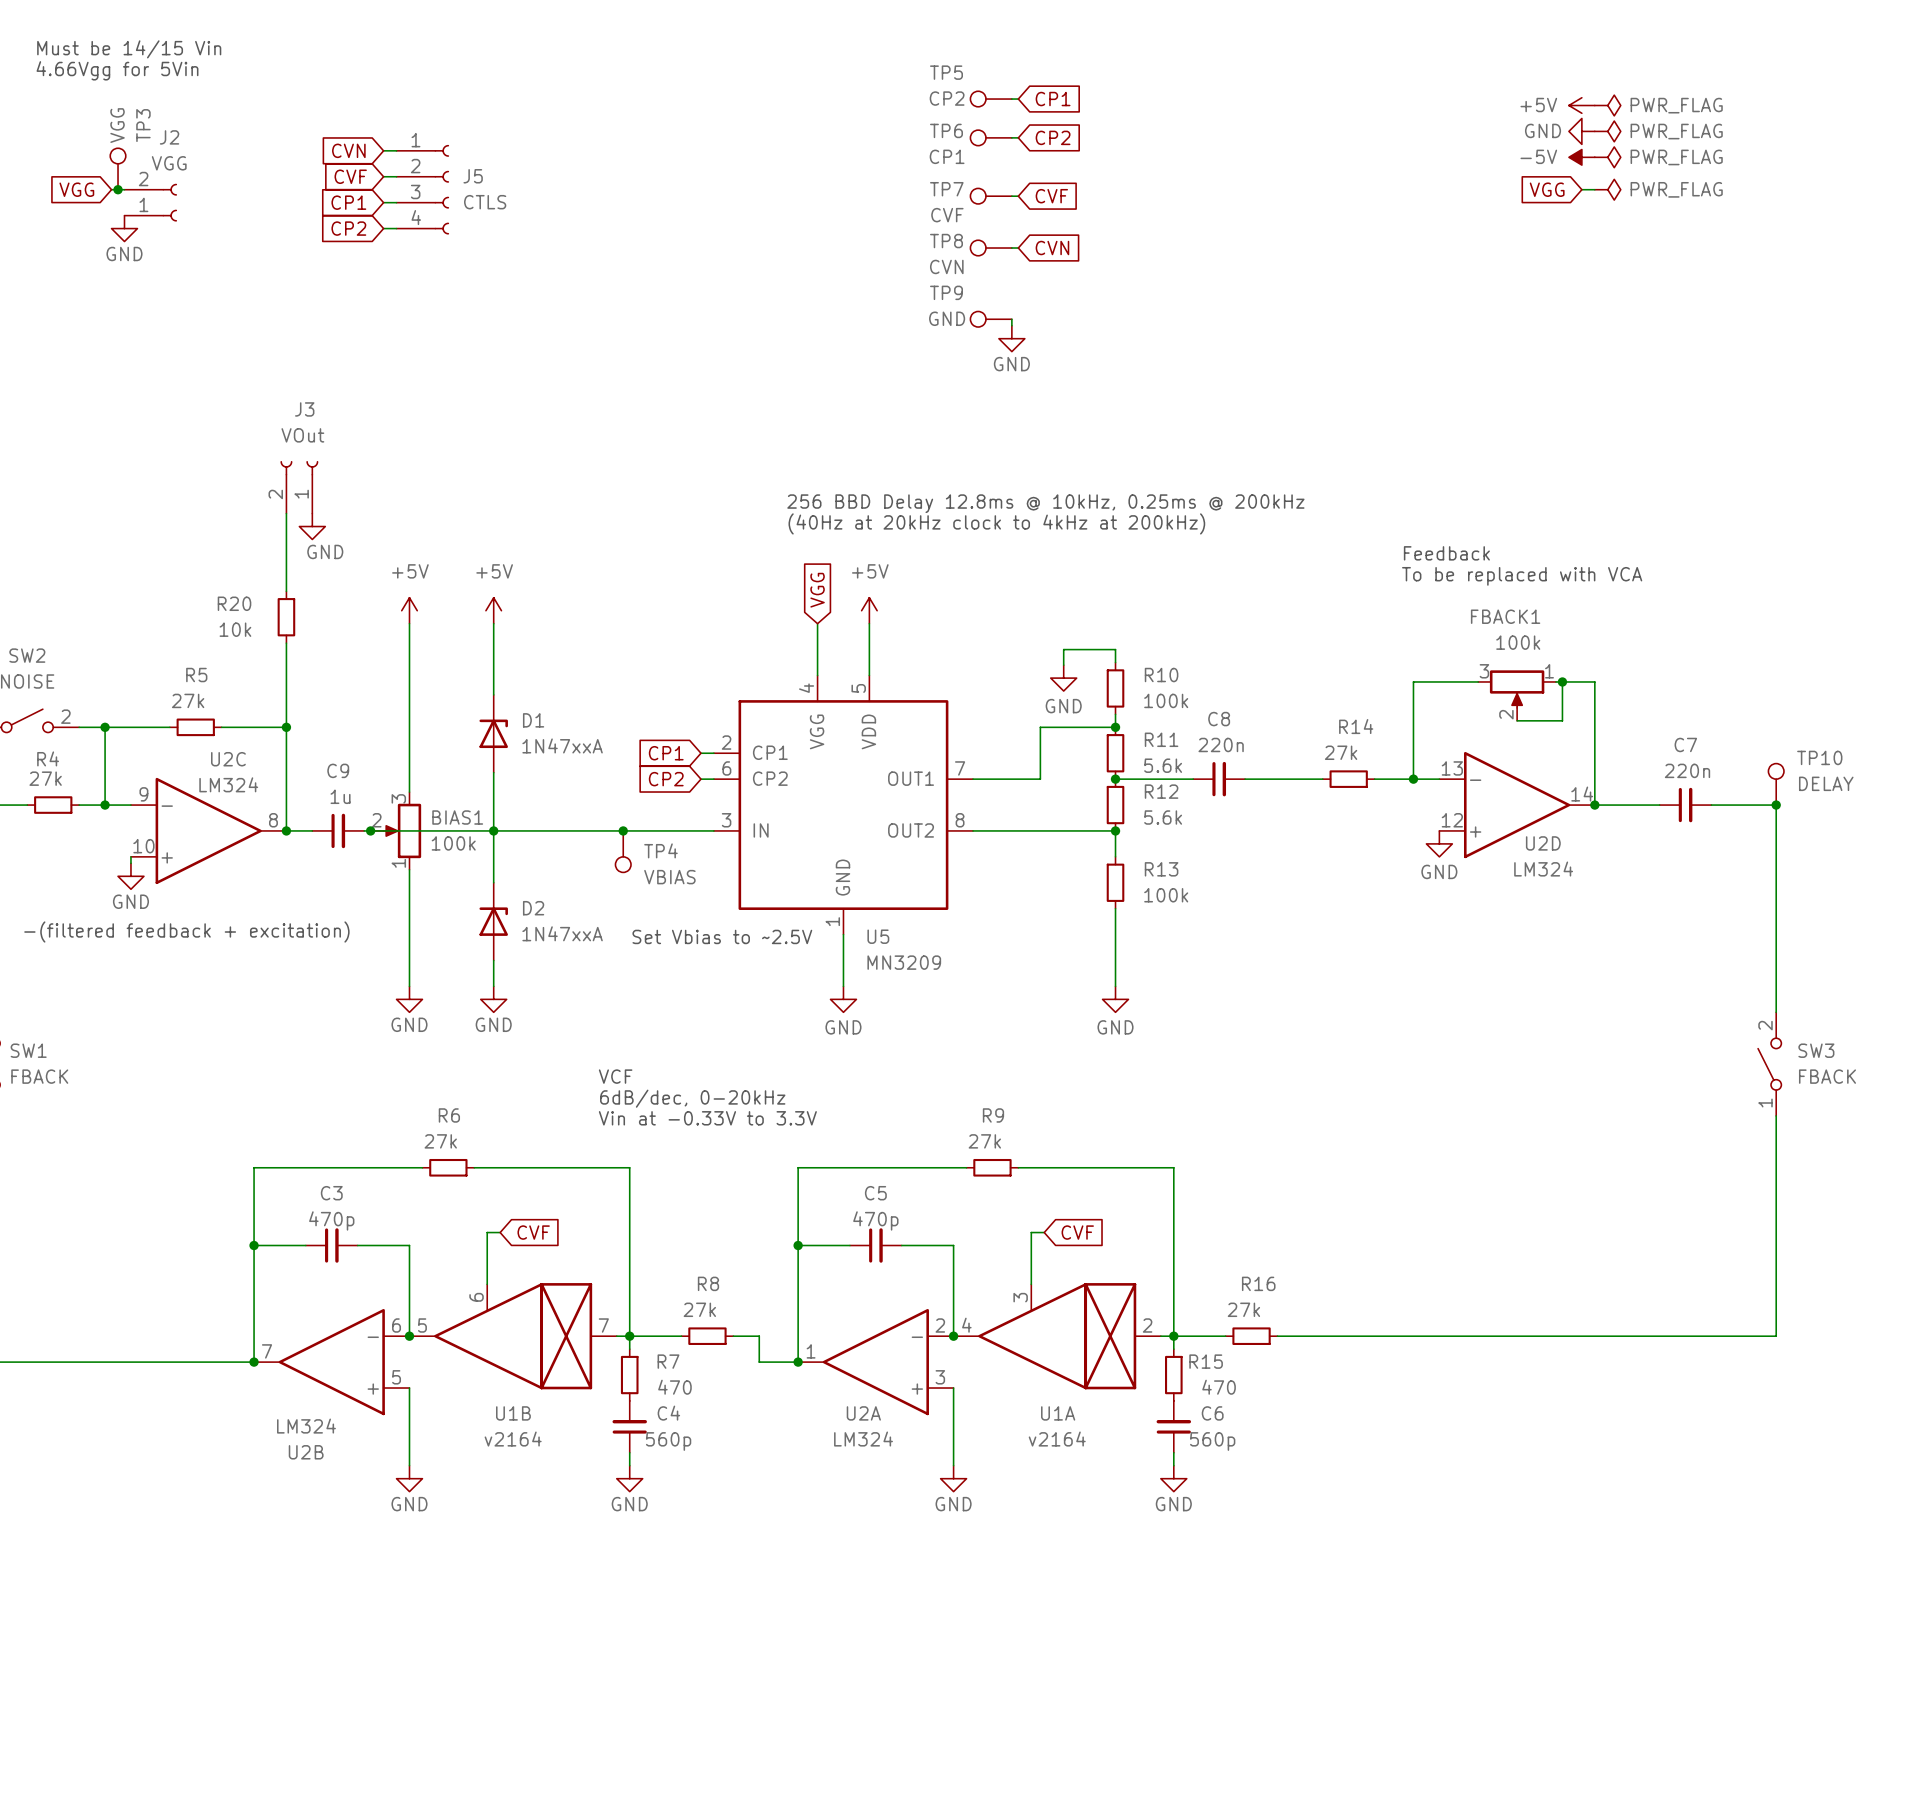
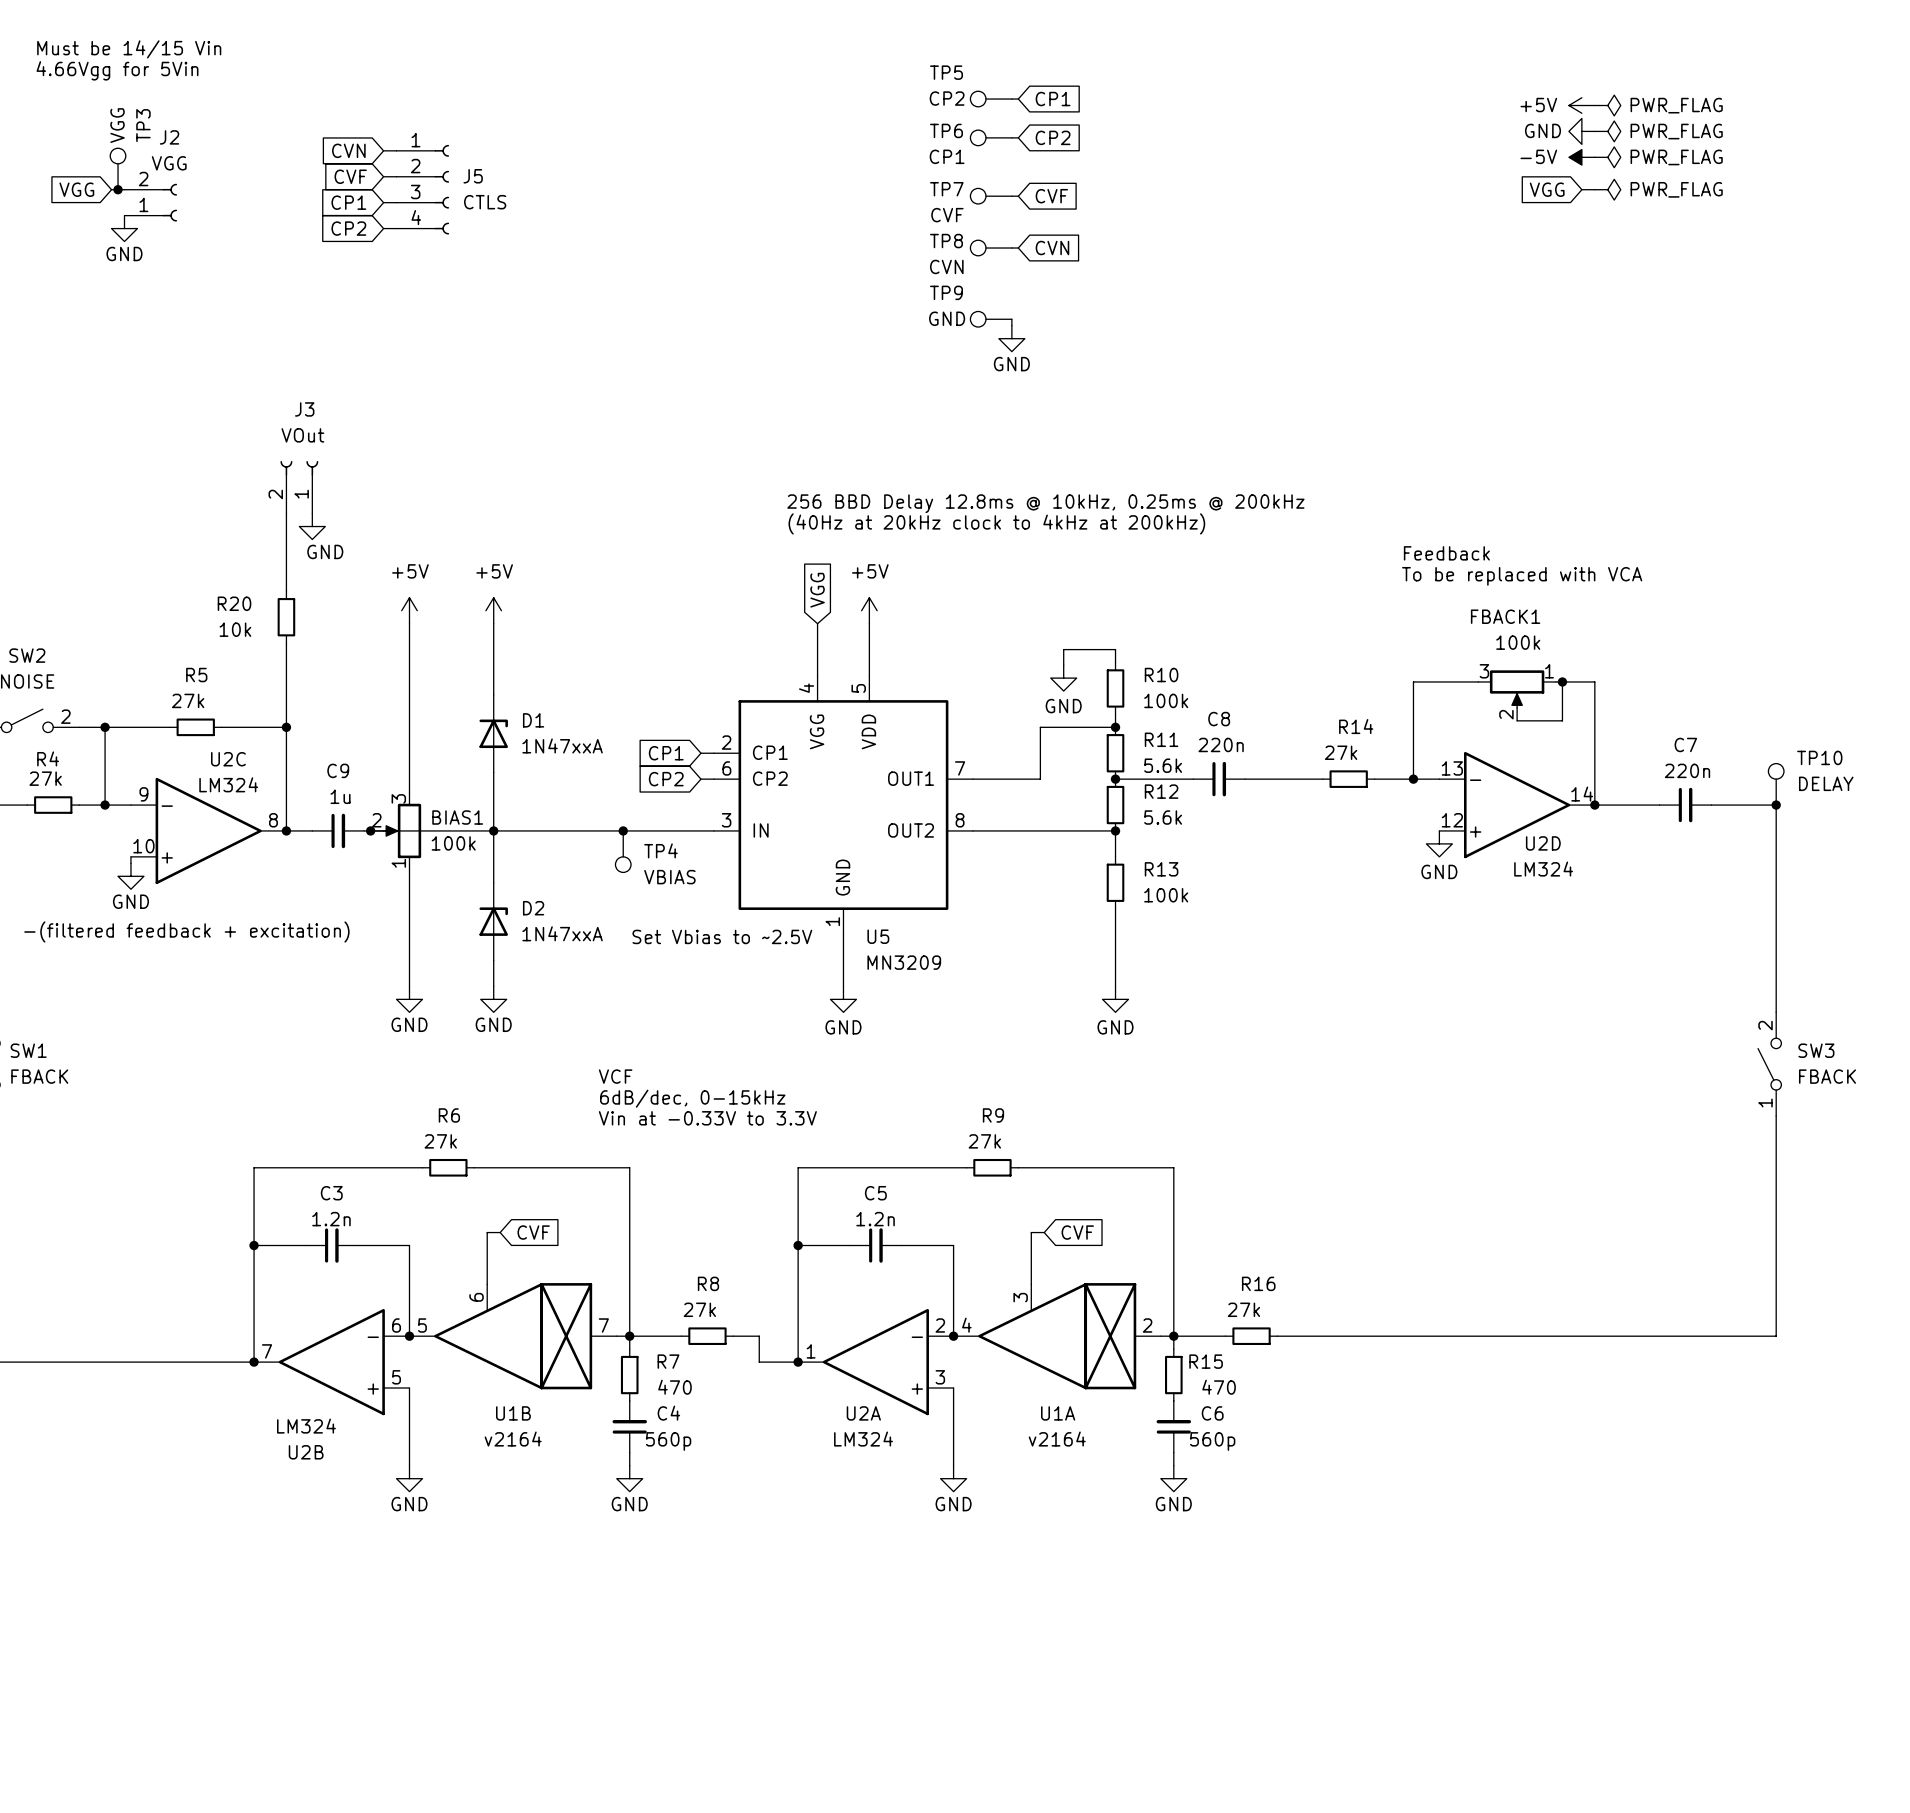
text: 6dB/dec, 0-20kHz (692, 1098) -> 6dB/dec, 0-15kHz (692, 1098)
C3 value: 470p (331, 1220) -> 1.2n (331, 1219)
C5 value: 470p (875, 1220) -> 1.2n (875, 1219)

